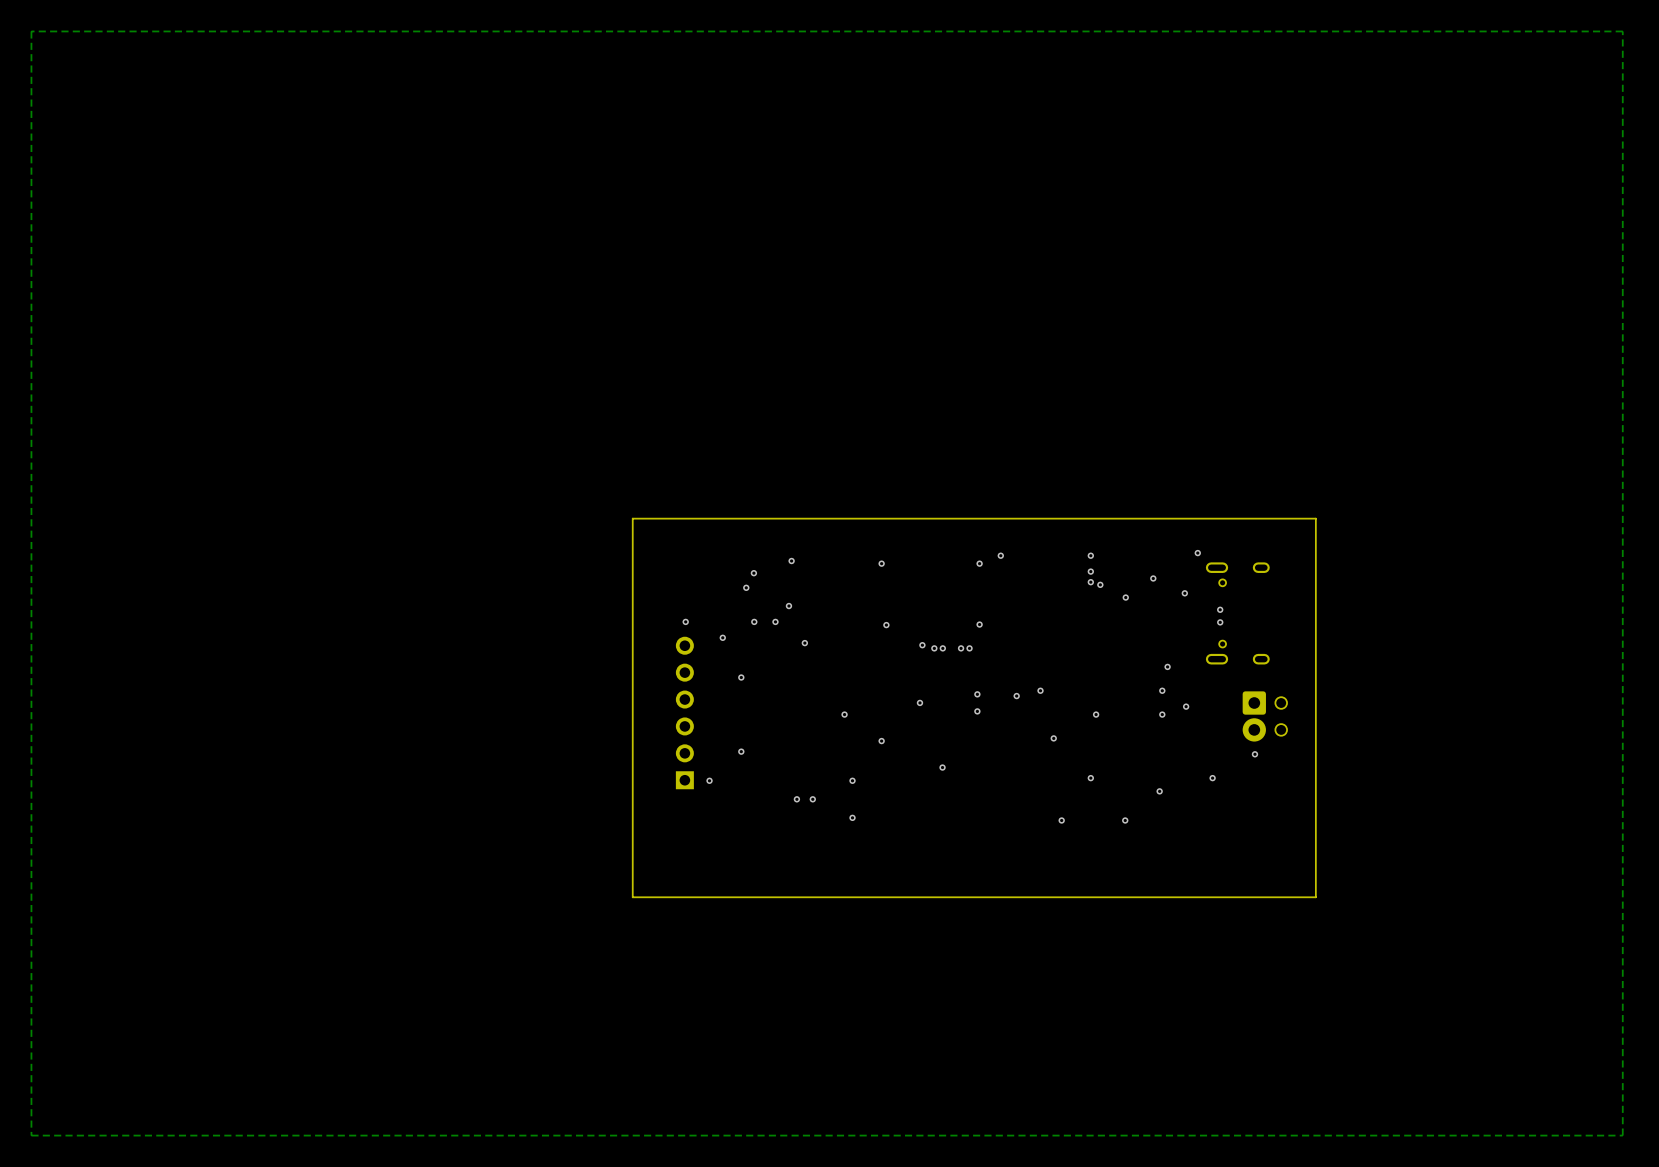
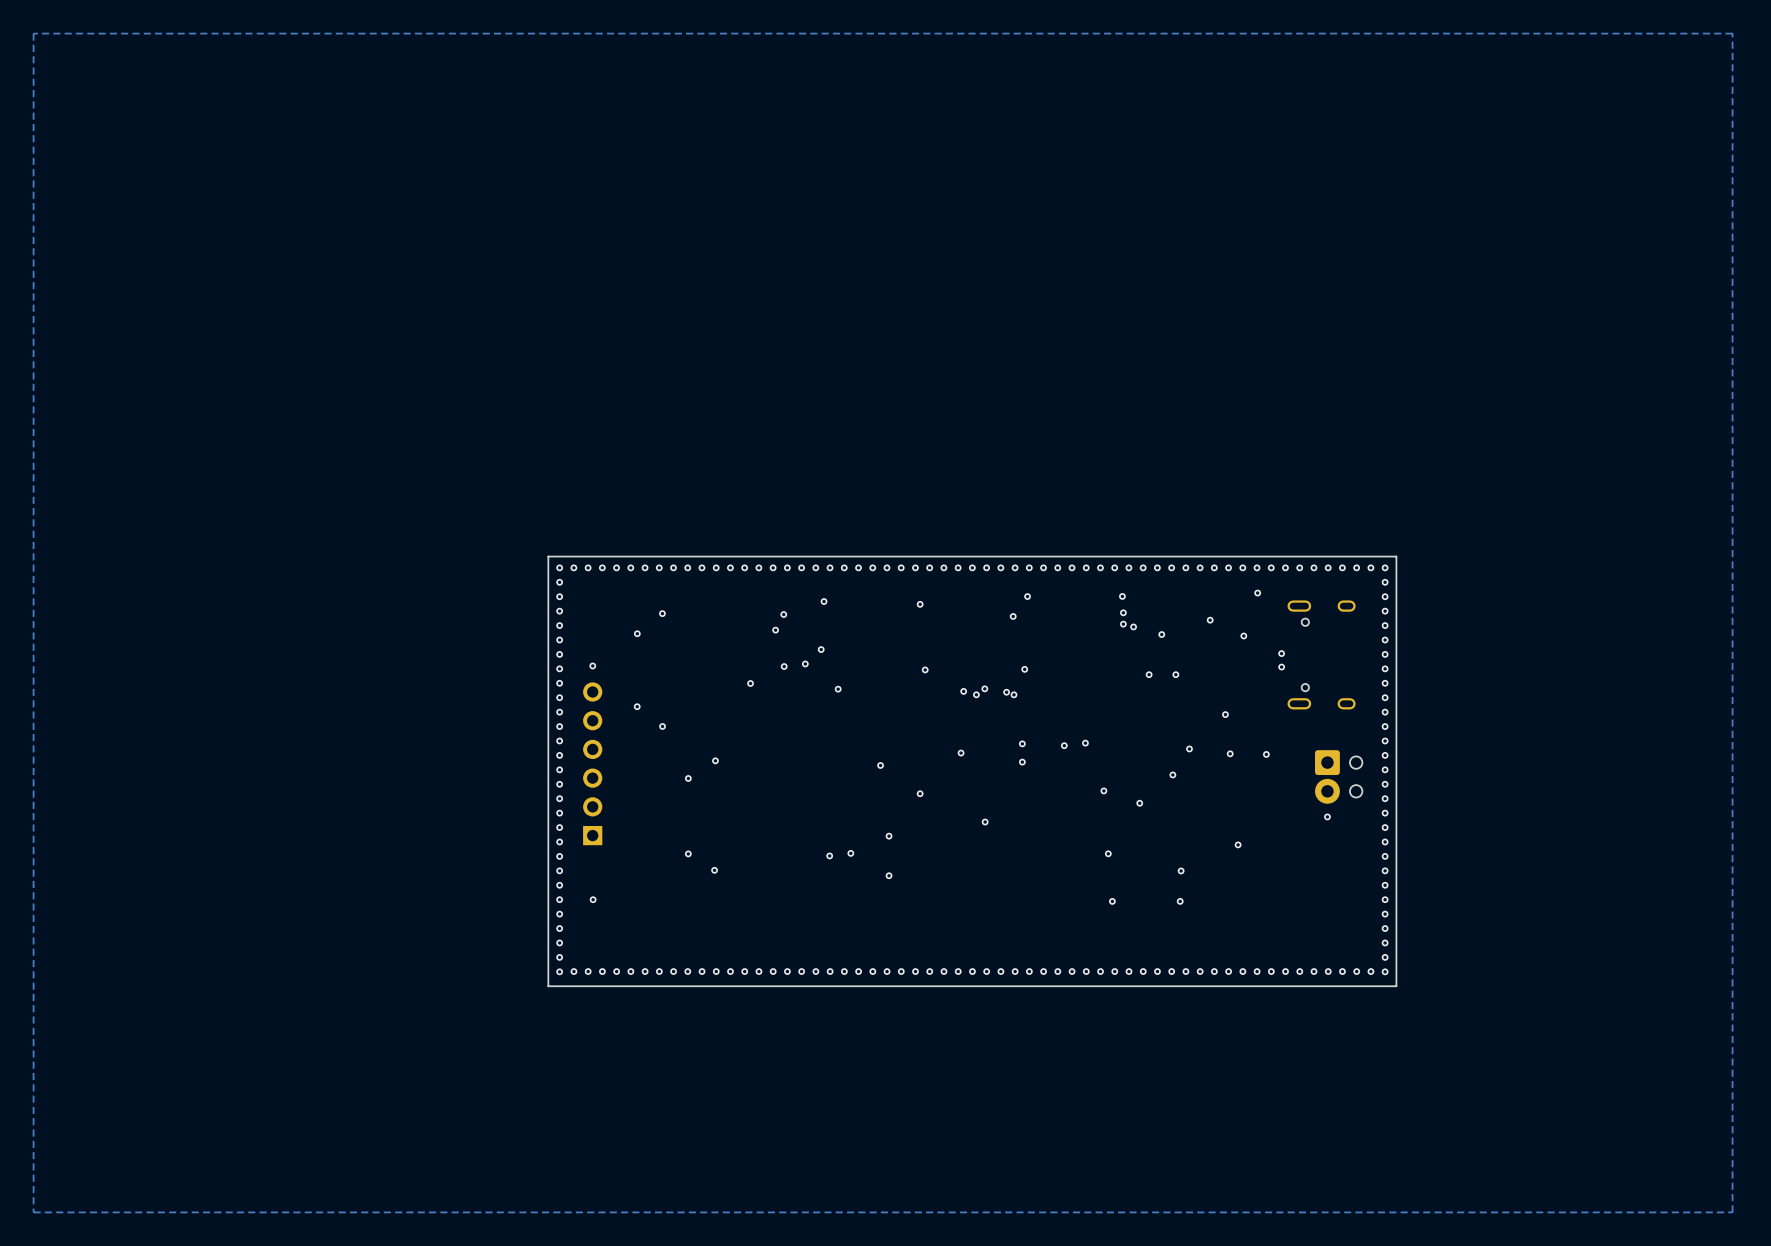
board edge: (1315, 518) (632, 518) (632, 897) (1315, 897) (1315, 518) -> (1396, 556) (1396, 986) (548, 986) (548, 556) (1396, 556)
via: none -> (559, 567)
via: none -> (573, 567)
via: none -> (588, 567)
via: none -> (602, 567)
via: none -> (616, 567)
via: none -> (630, 567)
via: none -> (645, 567)
via: none -> (659, 567)
via: none -> (673, 567)
via: none -> (687, 567)
via: none -> (701, 567)
via: none -> (716, 567)
via: none -> (730, 567)
via: none -> (744, 567)
via: none -> (758, 567)
via: none -> (773, 567)
via: none -> (787, 567)
via: none -> (801, 567)
via: none -> (815, 567)
via: none -> (830, 567)
via: none -> (844, 567)
via: none -> (858, 567)
via: none -> (872, 567)
via: none -> (886, 567)
via: none -> (901, 567)
via: none -> (915, 567)
via: none -> (929, 567)
via: none -> (943, 567)
via: none -> (958, 567)
via: none -> (972, 567)
via: none -> (986, 567)
via: none -> (1000, 567)
via: none -> (1015, 567)
via: none -> (1029, 567)
via: none -> (1043, 567)
via: none -> (1057, 567)
via: none -> (1072, 567)
via: none -> (1086, 567)
via: none -> (1100, 567)
via: none -> (1114, 567)
via: none -> (1128, 567)
via: none -> (1143, 567)
via: none -> (1157, 567)
via: none -> (1171, 567)
via: none -> (1185, 567)
via: none -> (1200, 567)
via: none -> (1214, 567)
via: none -> (1228, 567)
via: none -> (1242, 567)
via: none -> (1257, 567)
via: none -> (1271, 567)
via: none -> (1285, 567)
via: none -> (1299, 567)
via: none -> (1313, 567)
via: none -> (1328, 567)
via: none -> (1342, 567)
via: none -> (1356, 567)
via: none -> (1370, 567)
via: none -> (1385, 567)
via: none -> (559, 582)
via: none -> (1385, 582)
via: (1197, 553) -> none
via: (1000, 555) -> none
via: (1090, 555) -> none
via: none -> (1257, 593)
via: none -> (559, 596)
via: none -> (1027, 596)
via: none -> (1122, 596)
via: none -> (1385, 596)
via: (791, 561) -> none
via: none -> (824, 601)
via: (881, 563) -> none
via: (979, 563) -> none
via: none -> (920, 604)
via: (1090, 571) -> none
via: none -> (559, 611)
via: none -> (1385, 611)
via: (753, 573) -> none
via: none -> (1123, 612)
via: none -> (662, 613)
via: none -> (783, 614)
via: none -> (1013, 616)
via: (1153, 578) -> none
via: none -> (1210, 620)
via: (1090, 582) -> none
via: none -> (1123, 624)
via: (1100, 584) -> none
via: none -> (559, 625)
via: none -> (1385, 625)
via: (746, 587) -> none
via: none -> (1133, 626)
via: none -> (775, 630)
via: none -> (637, 633)
via: (1184, 593) -> none
via: none -> (1161, 634)
via: none -> (1243, 636)
via: (1125, 597) -> none
via: none -> (559, 640)
via: none -> (1385, 640)
via: (788, 606) -> none
via: none -> (821, 649)
via: (1220, 609) -> none
via: none -> (559, 654)
via: none -> (1281, 653)
via: none -> (1385, 654)
via: (685, 621) -> none
via: (775, 621) -> none
via: (1220, 622) -> none
via: none -> (592, 665)
via: none -> (784, 666)
via: (979, 624) -> none
via: none -> (1281, 667)
via: (886, 625) -> none
via: none -> (559, 668)
via: none -> (1024, 669)
via: none -> (1385, 668)
via: none -> (925, 669)
via: none -> (1149, 674)
via: none -> (1175, 674)
via: (722, 637) -> none
via: none -> (559, 683)
via: none -> (1385, 683)
via: none -> (750, 683)
via: (804, 643) -> none
via: none -> (838, 689)
via: none -> (963, 691)
via: (934, 648) -> none
via: (961, 648) -> none
via: (969, 648) -> none
via: none -> (976, 694)
via: none -> (1013, 694)
via: none -> (559, 697)
via: none -> (1385, 697)
via: none -> (637, 706)
via: (1167, 666) -> none
via: none -> (559, 712)
via: none -> (1385, 712)
via: none -> (1225, 714)
via: (741, 677) -> none
via: none -> (559, 726)
via: none -> (662, 726)
via: none -> (1385, 726)
via: (1040, 690) -> none
via: (1162, 690) -> none
via: none -> (559, 740)
via: (977, 694) -> none
via: none -> (1385, 740)
via: none -> (1022, 743)
via: none -> (1064, 745)
via: none -> (1189, 748)
via: (919, 702) -> none
via: none -> (961, 753)
via: none -> (1230, 753)
via: none -> (559, 755)
via: none -> (1385, 755)
via: (977, 711) -> none
via: none -> (715, 760)
part position: (684, 712) -> (592, 763)
via: none -> (1022, 762)
via: (844, 714) -> none
via: (1096, 714) -> none
via: (1162, 714) -> none
via: none -> (880, 765)
part position: (1264, 716) -> (1338, 776)
via: none -> (559, 769)
via: none -> (1385, 769)
via: none -> (1172, 774)
via: none -> (688, 778)
via: none -> (559, 784)
via: none -> (1385, 784)
via: (1053, 738) -> none
via: none -> (1103, 790)
via: (881, 741) -> none
via: none -> (920, 793)
via: none -> (559, 798)
via: none -> (1385, 798)
via: (741, 751) -> none
via: none -> (1139, 803)
via position: (1254, 754) -> (1327, 816)
via: none -> (559, 813)
via: none -> (1385, 813)
via position: (942, 767) -> (985, 822)
via: none -> (559, 827)
via: none -> (1385, 827)
via: (1090, 778) -> none
via: (1212, 778) -> none
via: (709, 780) -> none
via: (852, 780) -> none
via: none -> (889, 836)
via: none -> (559, 841)
via: none -> (1385, 841)
via: none -> (688, 853)
via: (812, 799) -> none
via: none -> (1108, 853)
via: none -> (829, 855)
via: none -> (559, 856)
via: none -> (1385, 856)
via: none -> (559, 870)
via: none -> (714, 870)
via: none -> (1181, 870)
via: none -> (1385, 870)
via: (852, 817) -> none
via: none -> (889, 875)
via: (1061, 820) -> none
via: (1125, 820) -> none
via: none -> (559, 885)
via: none -> (1385, 885)
via: none -> (559, 899)
via: none -> (593, 899)
via: none -> (1385, 899)
via: none -> (1112, 901)
via: none -> (1180, 901)
via: none -> (559, 914)
via: none -> (1385, 914)
via: none -> (559, 928)
via: none -> (1385, 928)
via: none -> (559, 942)
via: none -> (1385, 942)
via: none -> (559, 957)
via: none -> (1385, 957)
via: none -> (573, 971)
via: none -> (588, 971)
via: none -> (602, 971)
via: none -> (616, 971)
via: none -> (630, 971)
via: none -> (645, 971)
via: none -> (659, 971)
via: none -> (673, 971)
via: none -> (687, 971)
via: none -> (702, 971)
via: none -> (716, 971)
via: none -> (730, 971)
via: none -> (744, 971)
via: none -> (758, 971)
via: none -> (773, 971)
via: none -> (787, 971)
via: none -> (801, 971)
via: none -> (815, 971)
via: none -> (830, 971)
via: none -> (844, 971)
via: none -> (858, 971)
via: none -> (872, 971)
via: none -> (887, 971)
via: none -> (901, 971)
via: none -> (915, 971)
via: none -> (929, 971)
via: none -> (943, 971)
via: none -> (958, 971)
via: none -> (972, 971)
via: none -> (986, 971)
via: none -> (1000, 971)
via: none -> (1015, 971)
via: none -> (1029, 971)
via: none -> (1043, 971)
via: none -> (1057, 971)
via: none -> (1072, 971)
via: none -> (1086, 971)
via: none -> (1100, 971)
via: none -> (1114, 971)
via: none -> (1129, 971)
via: none -> (1143, 971)
via: none -> (1157, 971)
via: none -> (1171, 971)
via: none -> (1185, 971)
via: none -> (1200, 971)
via: none -> (1214, 971)
via: none -> (1228, 971)
via: none -> (1242, 971)
via: none -> (1257, 971)
via: none -> (1271, 971)
via: none -> (1285, 971)
via: none -> (1299, 971)
via: none -> (1314, 971)
via: none -> (1328, 971)
via: none -> (1342, 971)
via: none -> (1356, 971)
via: none -> (1370, 971)
via: none -> (559, 971)
via: none -> (1385, 971)

